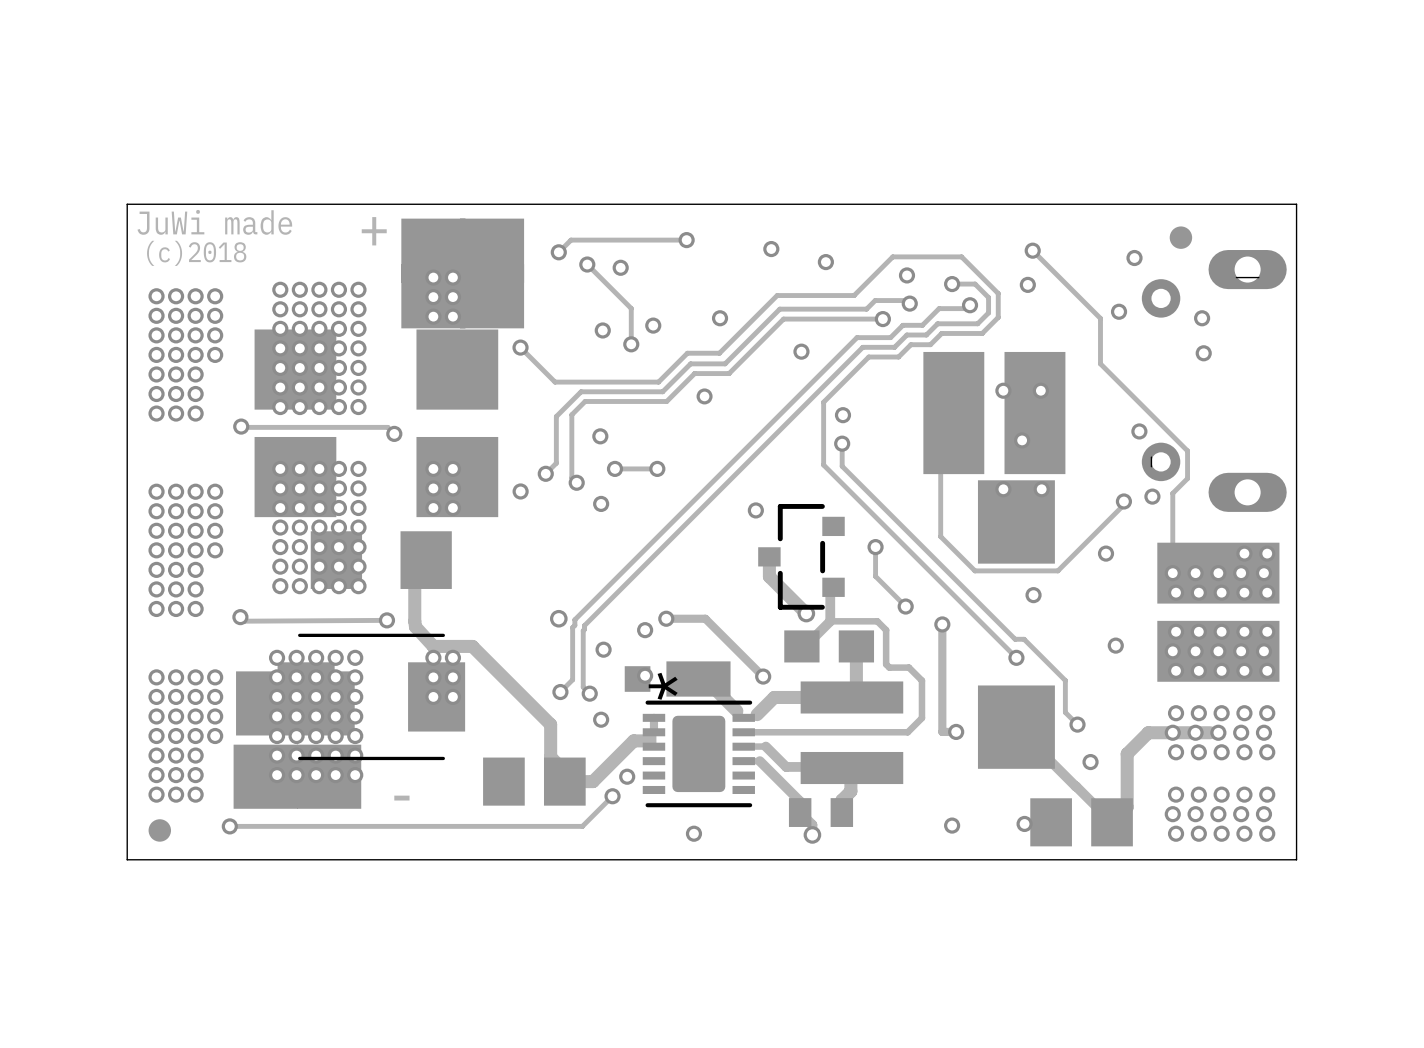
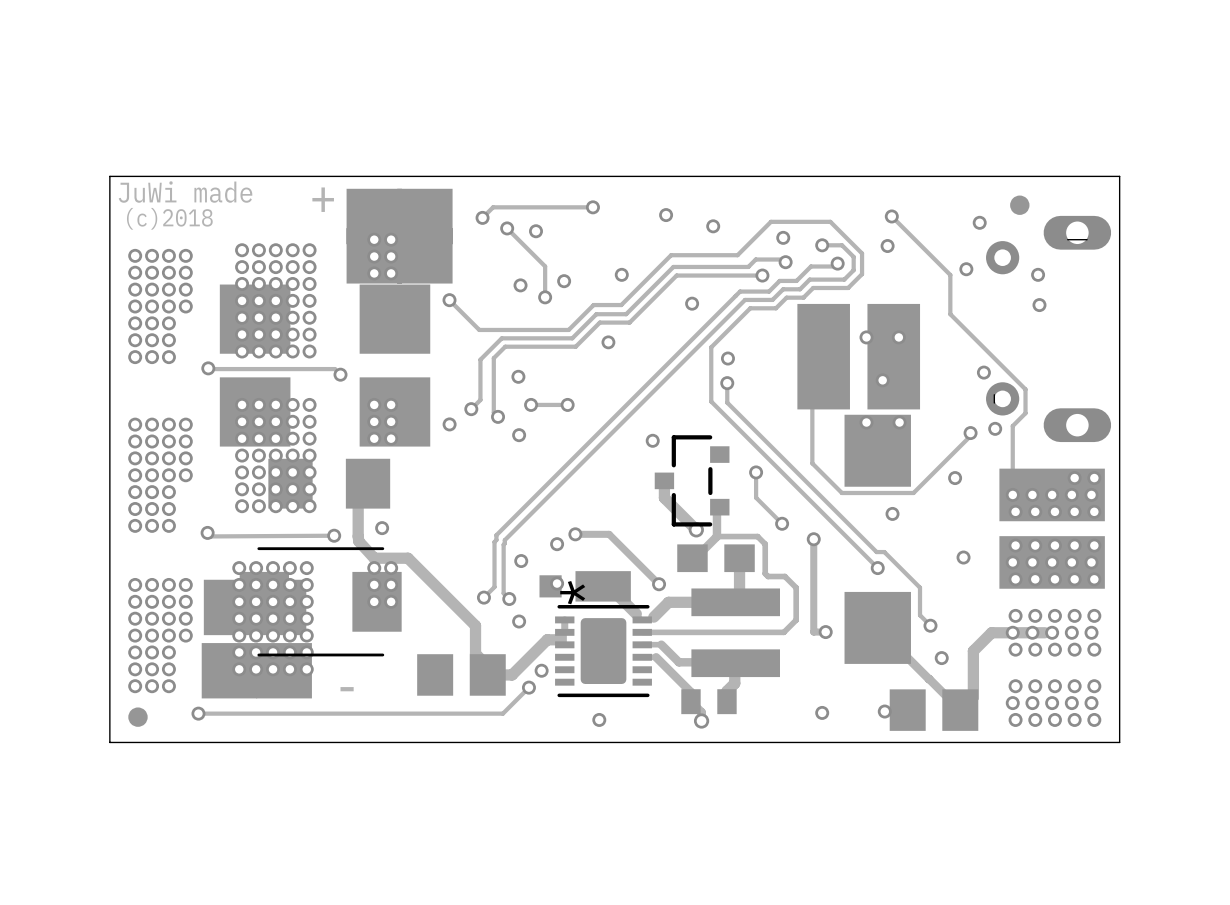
via: none -> (382, 528)
via: (558, 618) -> none

